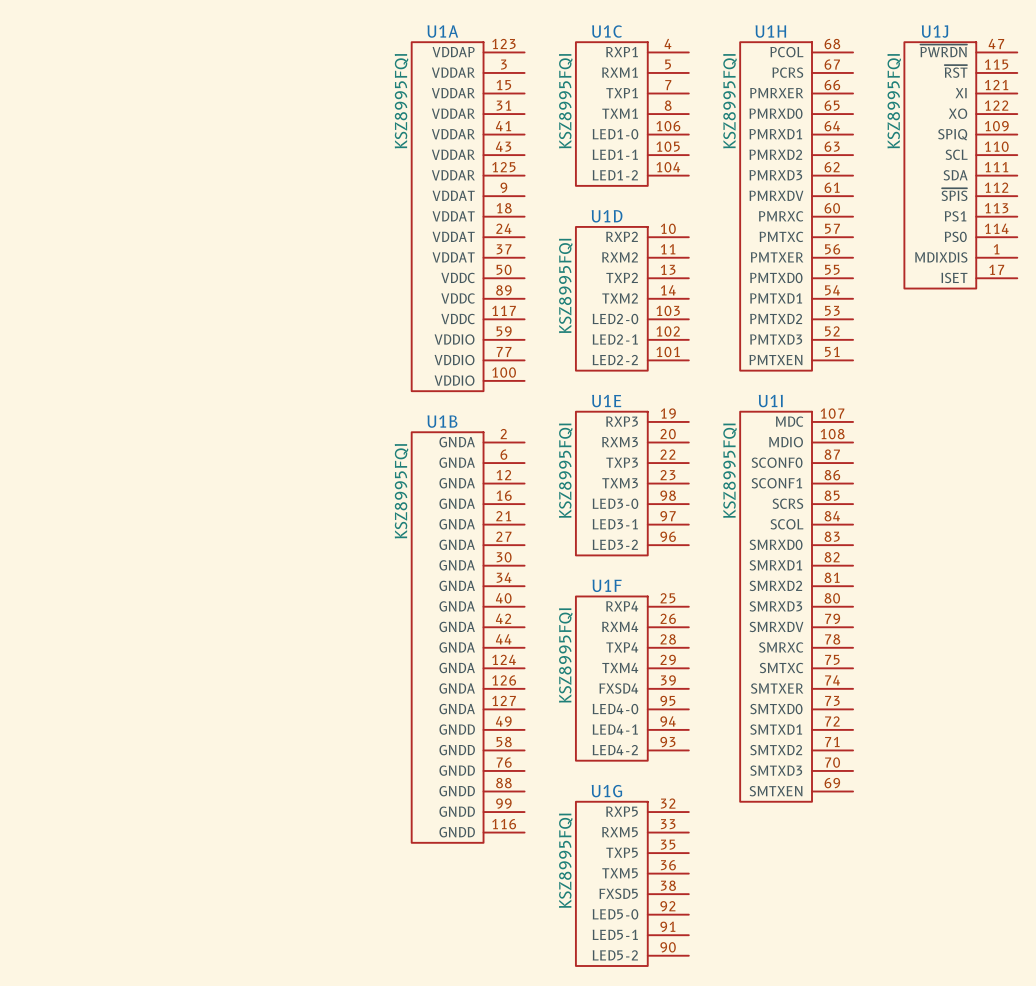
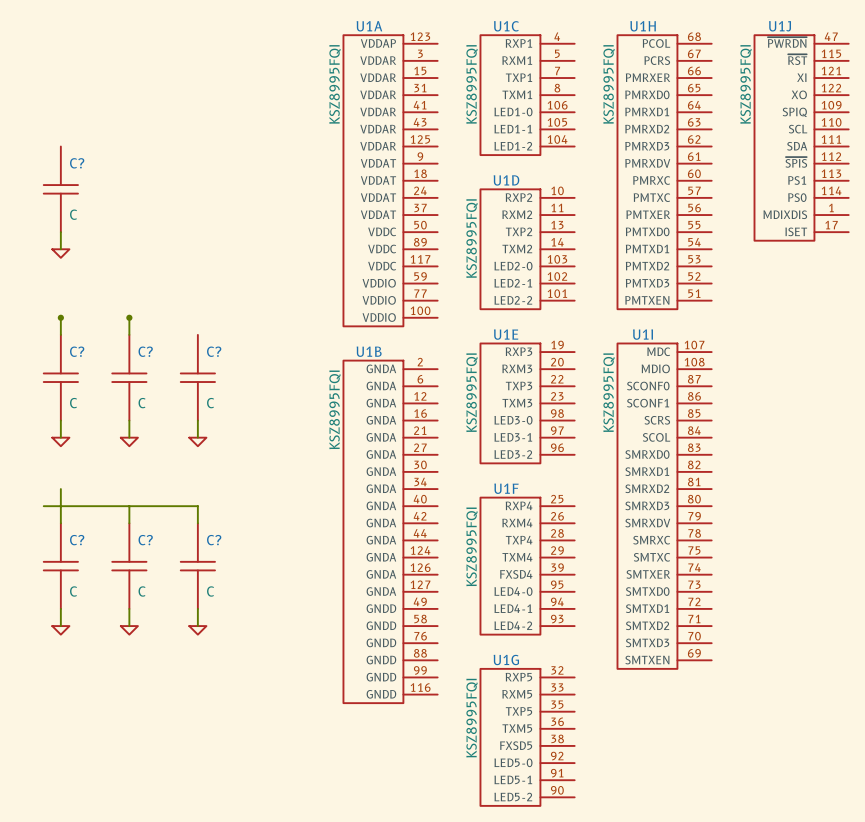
C?: none -> C (60, 189)
wire: none -> (60, 232) (60, 249)
power symbol: none -> (60, 253)
wire: none -> (60, 317) (60, 334)
junction: none -> (60, 317)
wire: none -> (129, 317) (129, 334)
junction: none -> (129, 317)
C?: none -> C (60, 377)
C?: none -> C (129, 377)
C?: none -> C (197, 377)
wire: none -> (60, 420) (60, 437)
wire: none -> (129, 420) (129, 437)
wire: none -> (197, 420) (197, 437)
power symbol: none -> (60, 441)
power symbol: none -> (129, 441)
power symbol: none -> (197, 441)
wire: none -> (60, 489) (60, 523)
wire: none -> (43, 506) (197, 506) (197, 523)
wire: none -> (129, 506) (129, 523)
C?: none -> C (60, 566)
C?: none -> C (129, 566)
C?: none -> C (197, 566)
wire: none -> (60, 608) (60, 626)
wire: none -> (129, 608) (129, 626)
wire: none -> (197, 608) (197, 626)
power symbol: none -> (60, 630)
power symbol: none -> (129, 630)
power symbol: none -> (197, 630)

